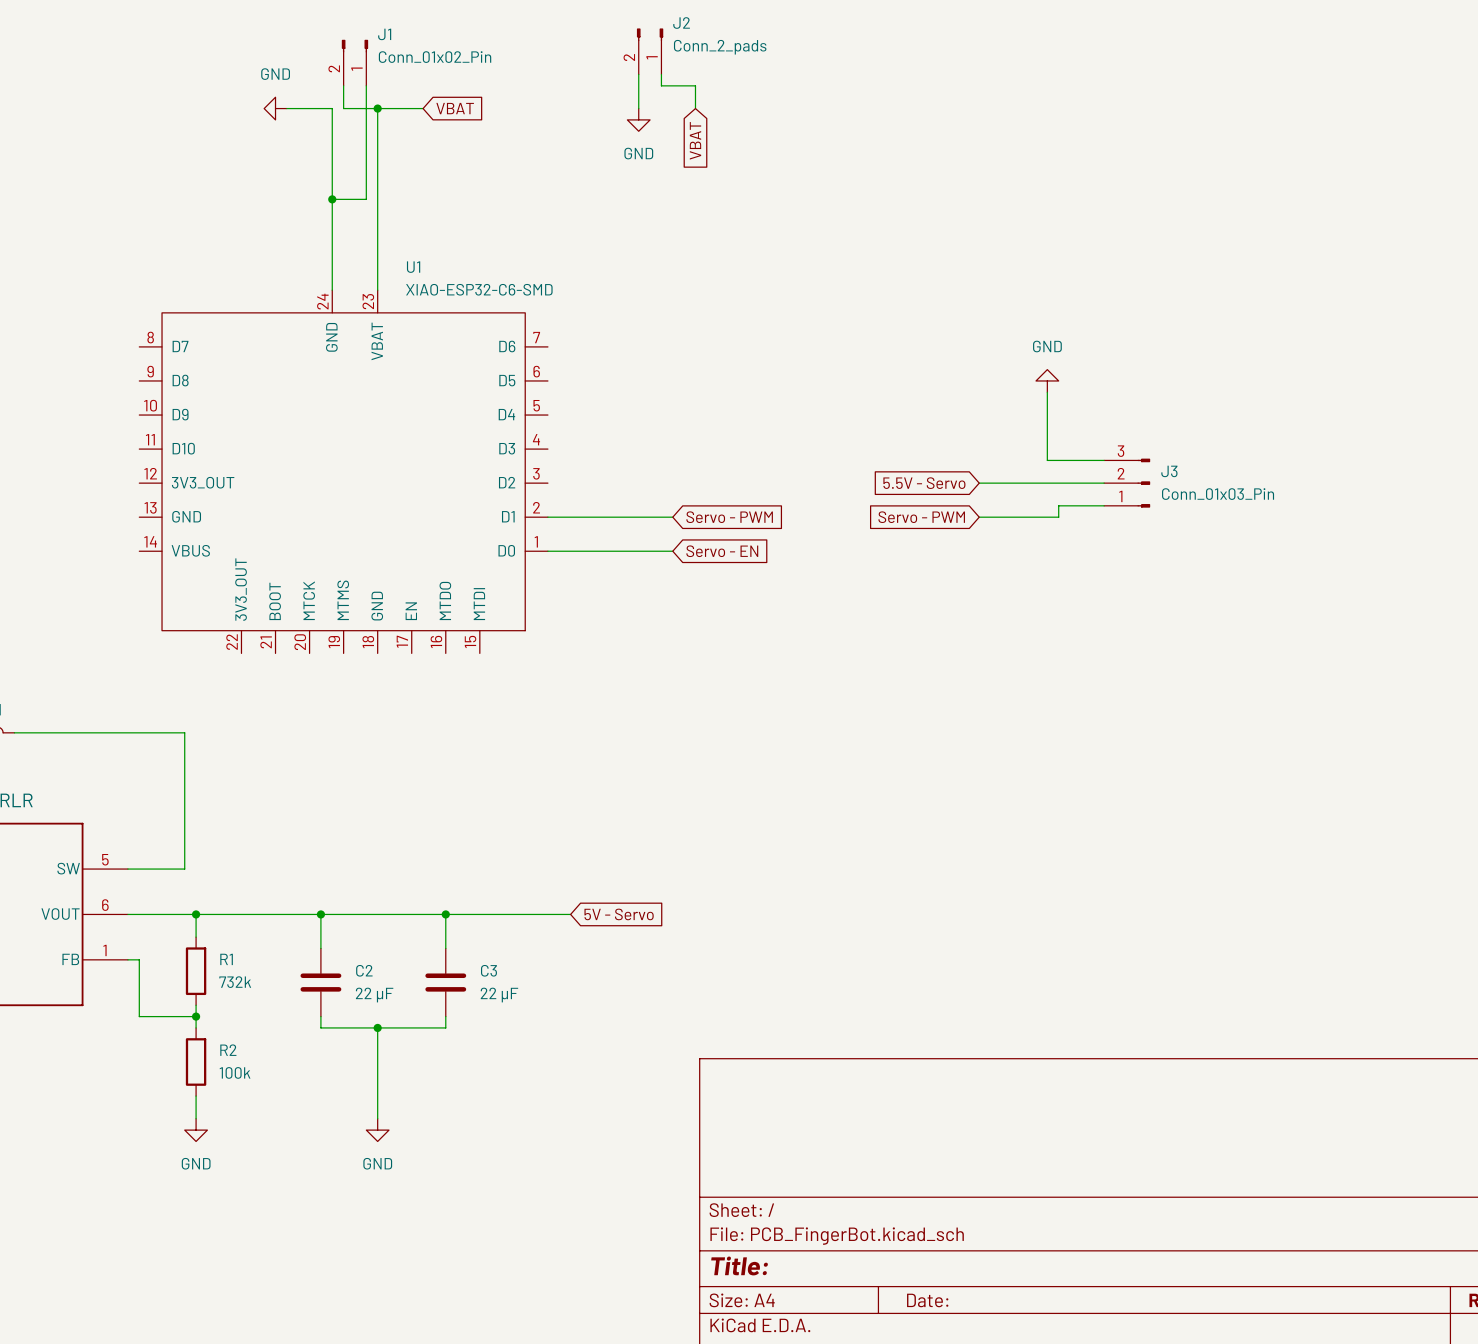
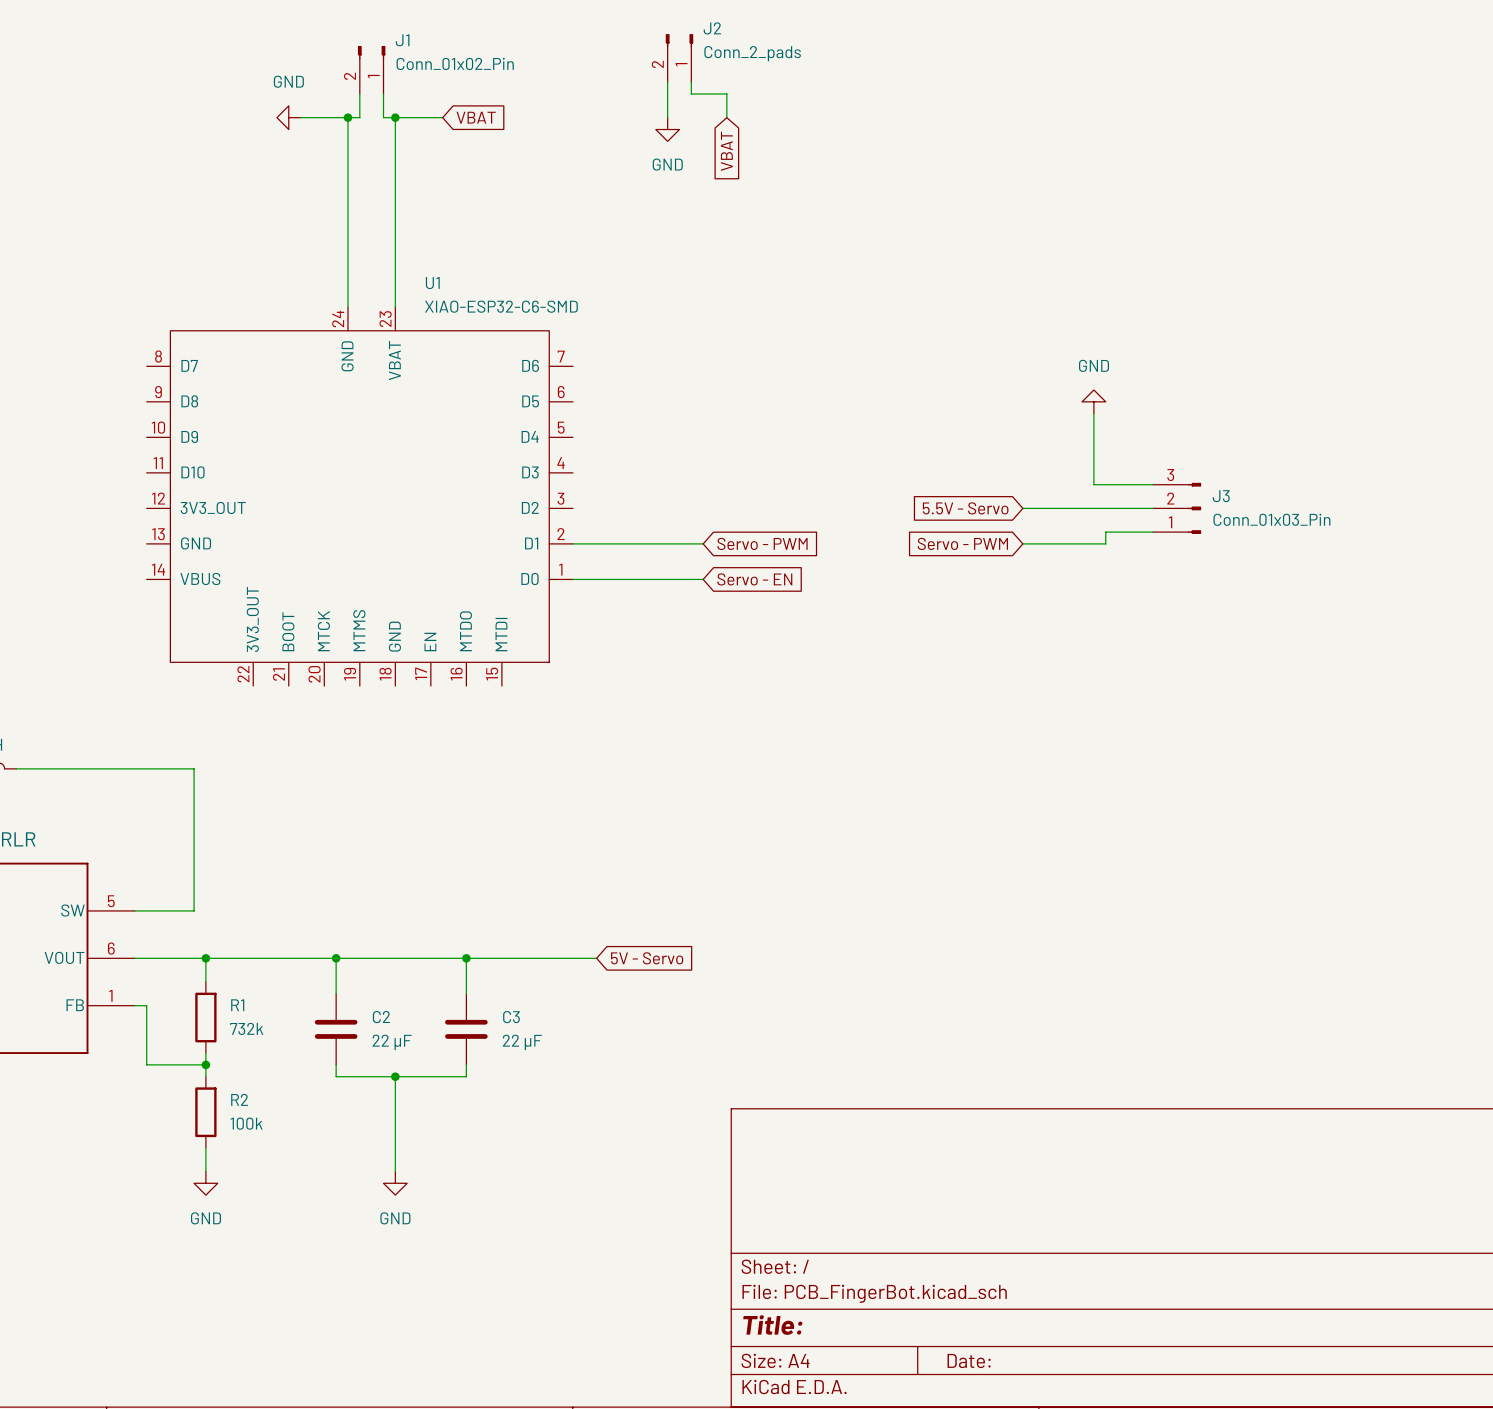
junction: none -> (347, 117)
wire: (343, 108) (366, 108) (366, 199) (332, 199) -> (359, 117) (347, 117)
junction: (332, 199) -> none

